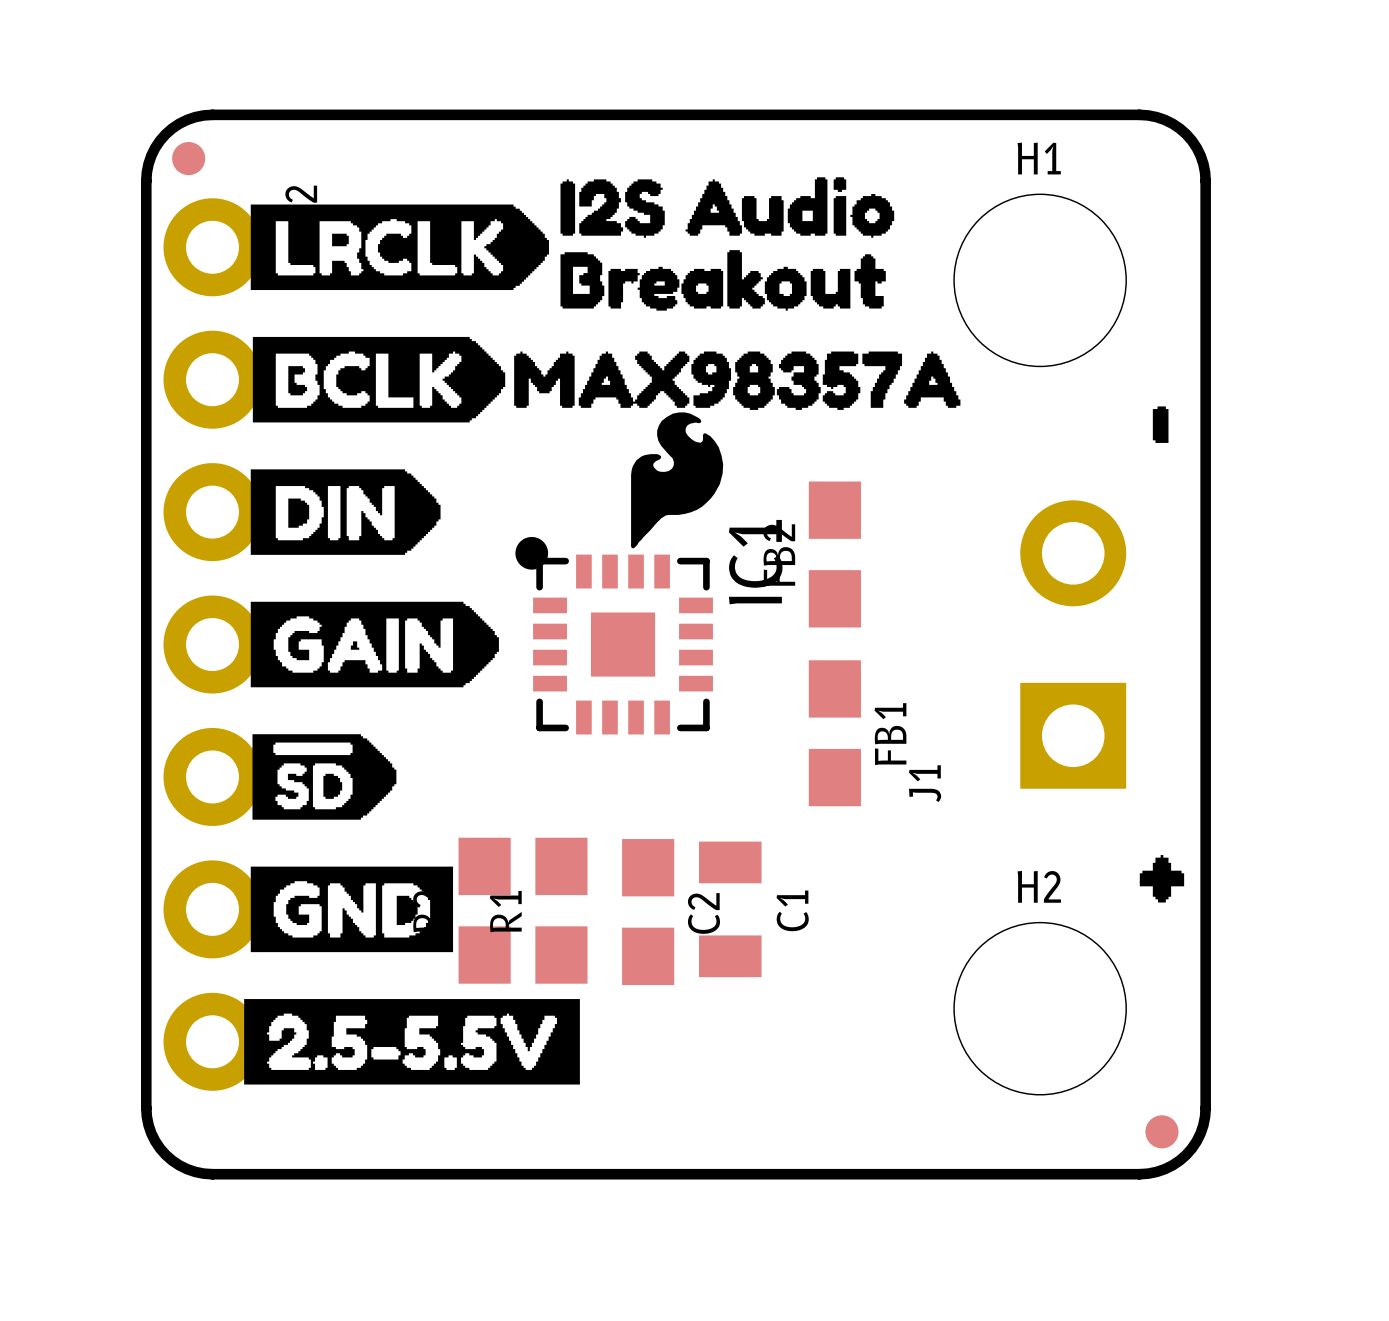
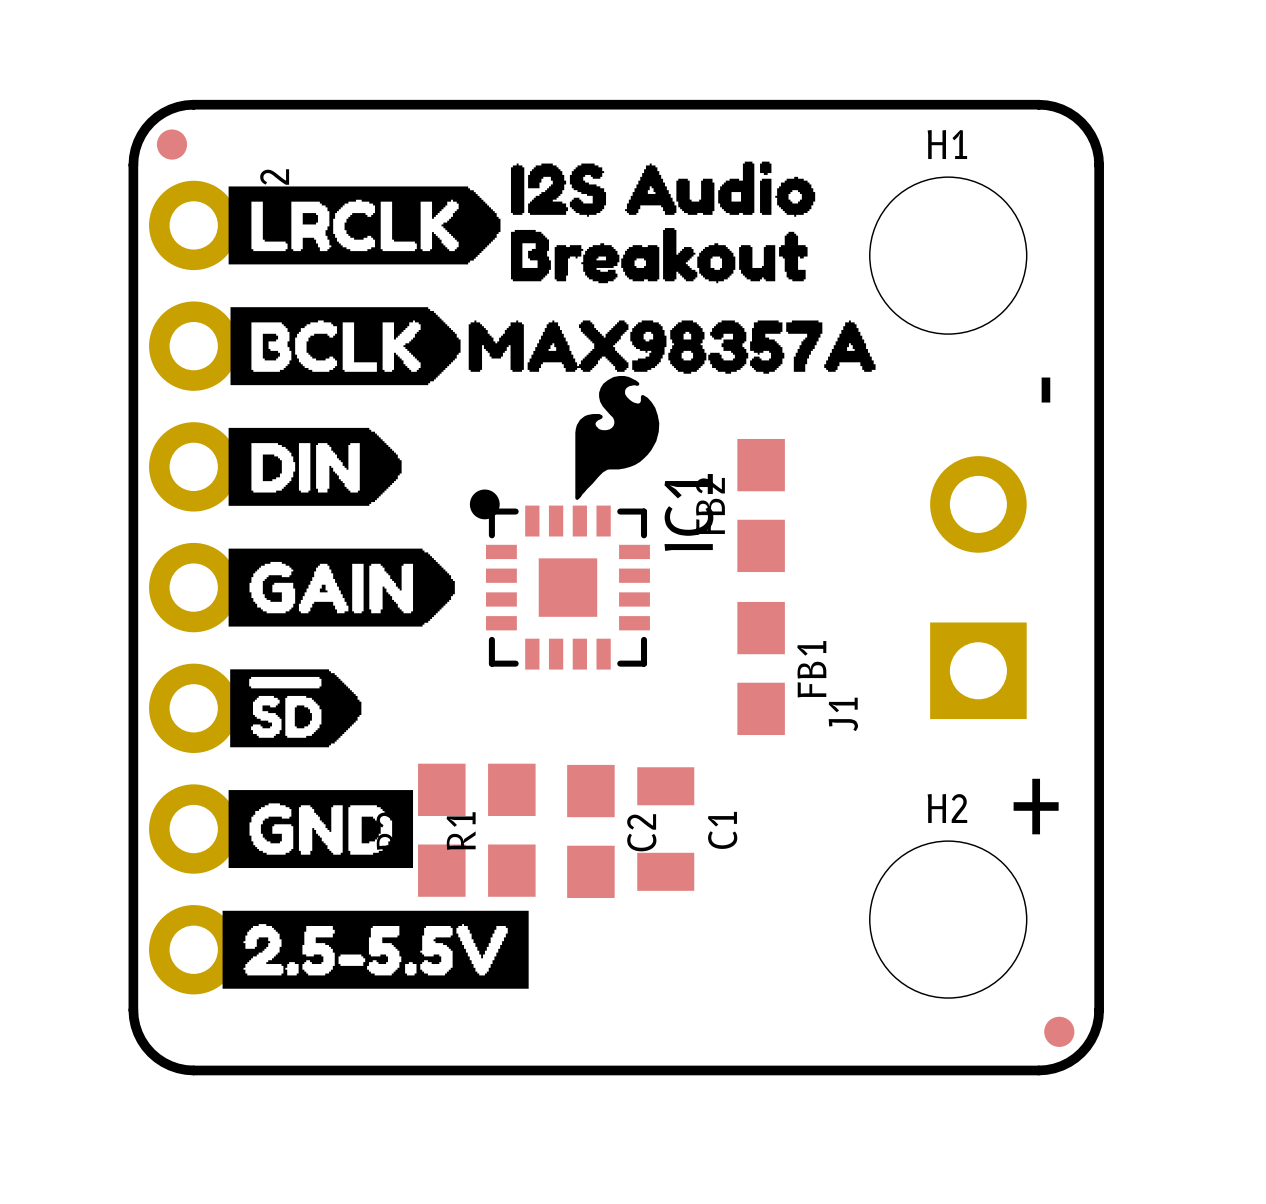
drawing: [1152, 406, 1169, 443] -> none
text: none -> - (1045, 390)
drawing: [1139, 855, 1185, 903] -> none
text: none -> + (1036, 806)

